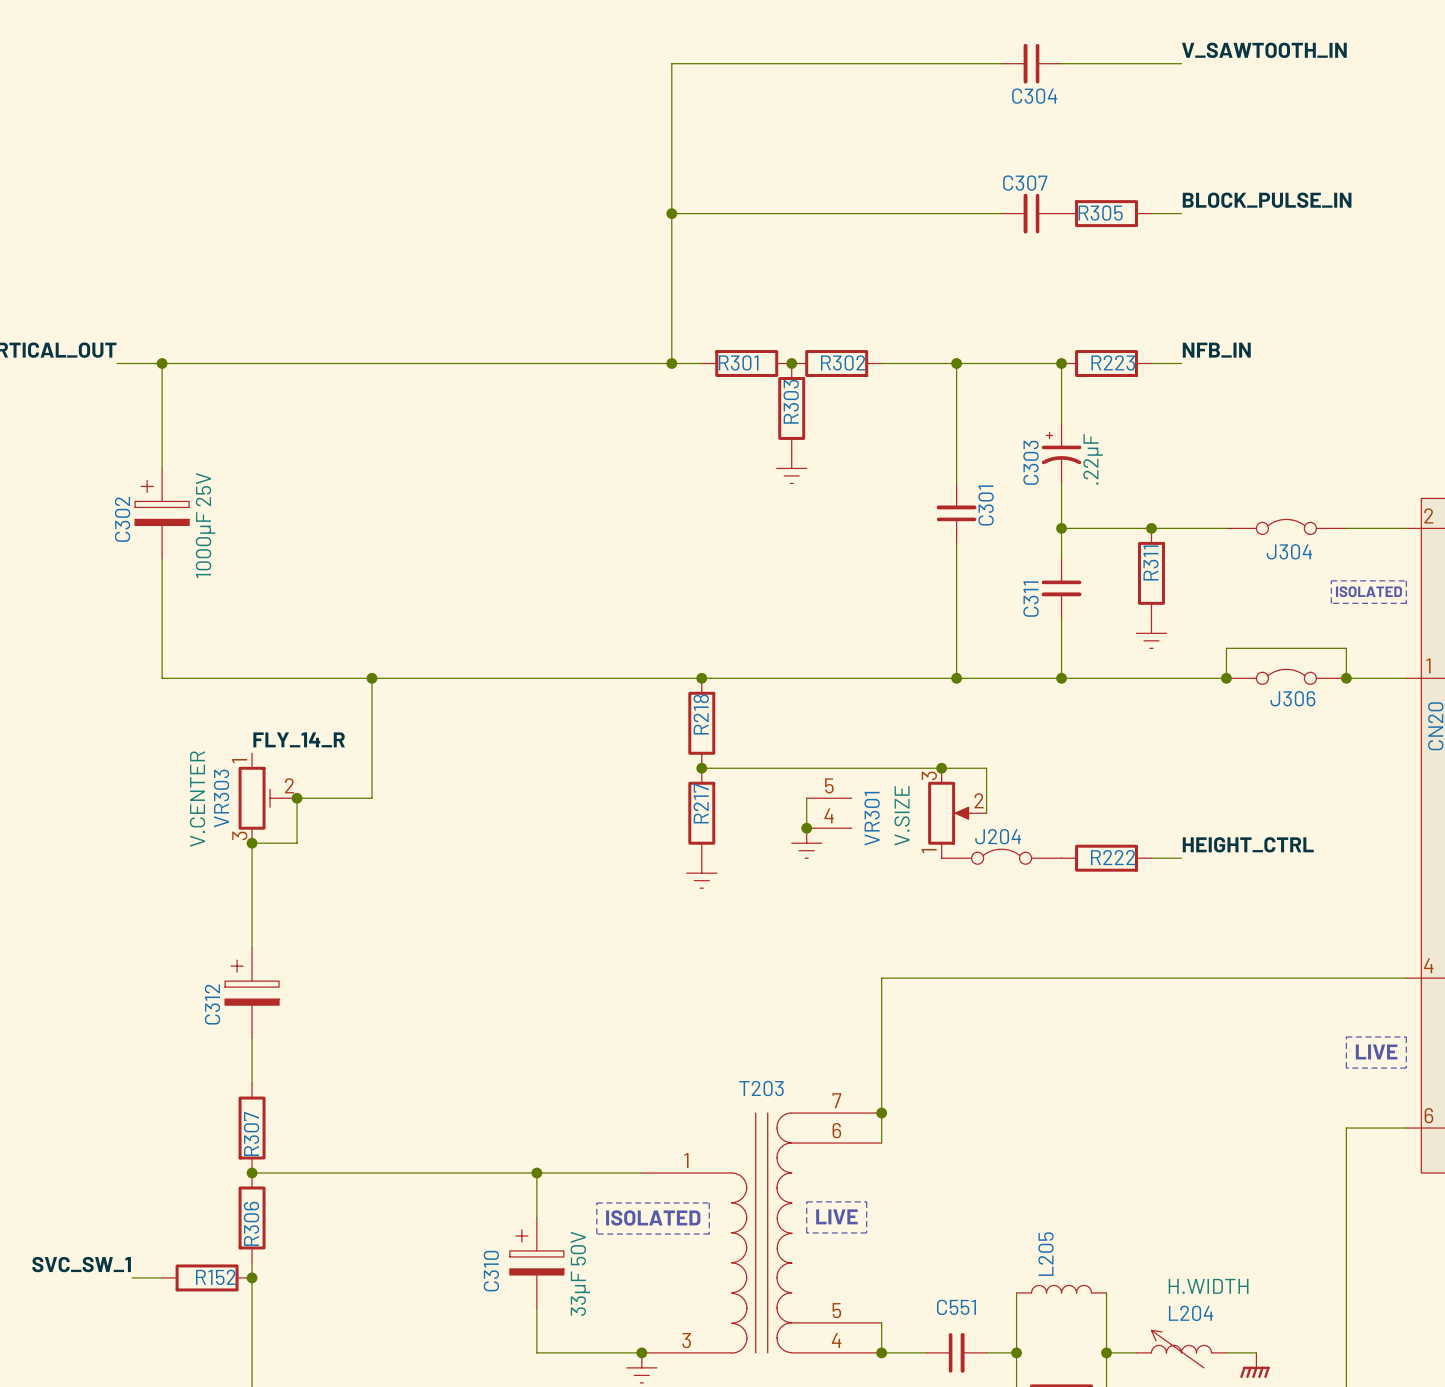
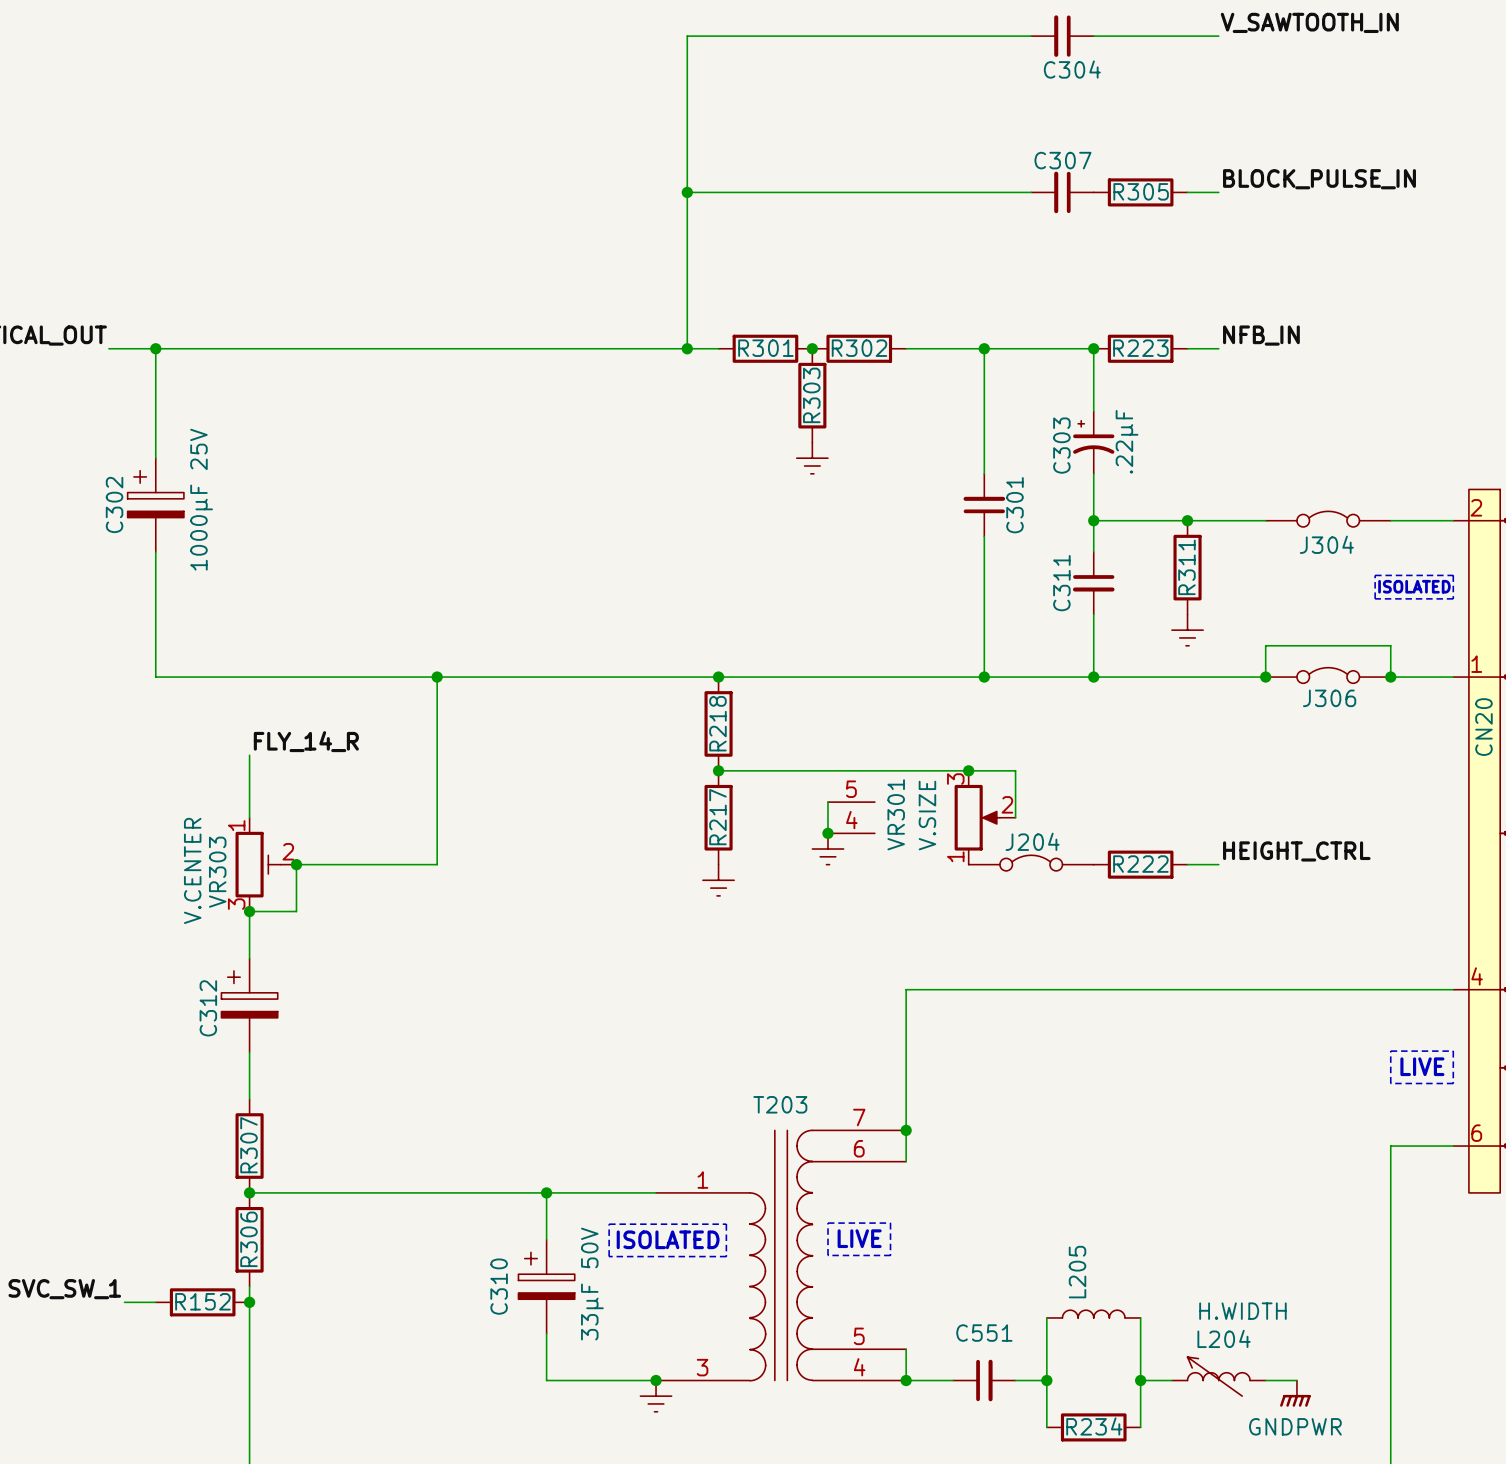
wire: (371, 678) (371, 798) (297, 798) (297, 843) (252, 843) (252, 903) -> (437, 677) (437, 864) (296, 864) (296, 911) (249, 911)
junction position: (371, 678) -> (437, 677)
wire: none -> (249, 755) (249, 817)
VR303 position: (267, 798) -> (265, 864)
junction: (297, 798) -> none
junction: (252, 843) -> none
junction: none -> (296, 864)
junction: none -> (249, 911)

